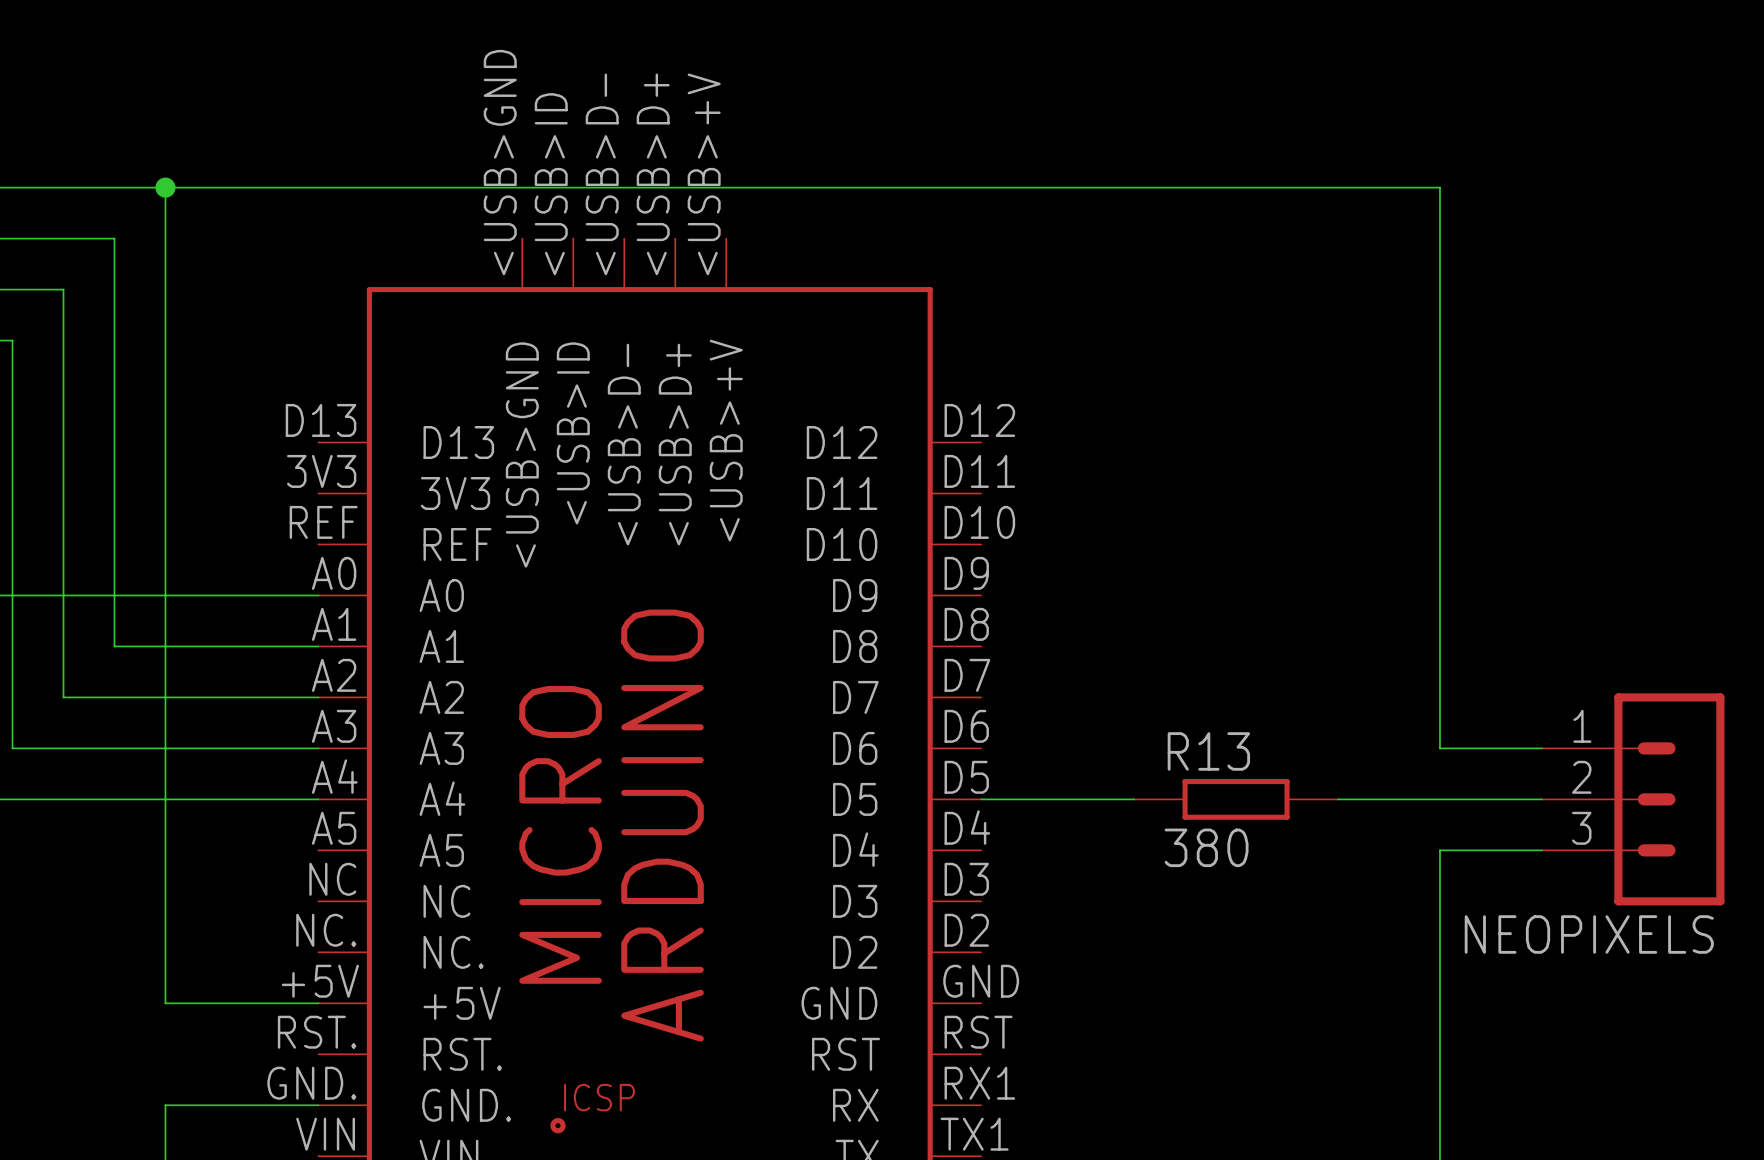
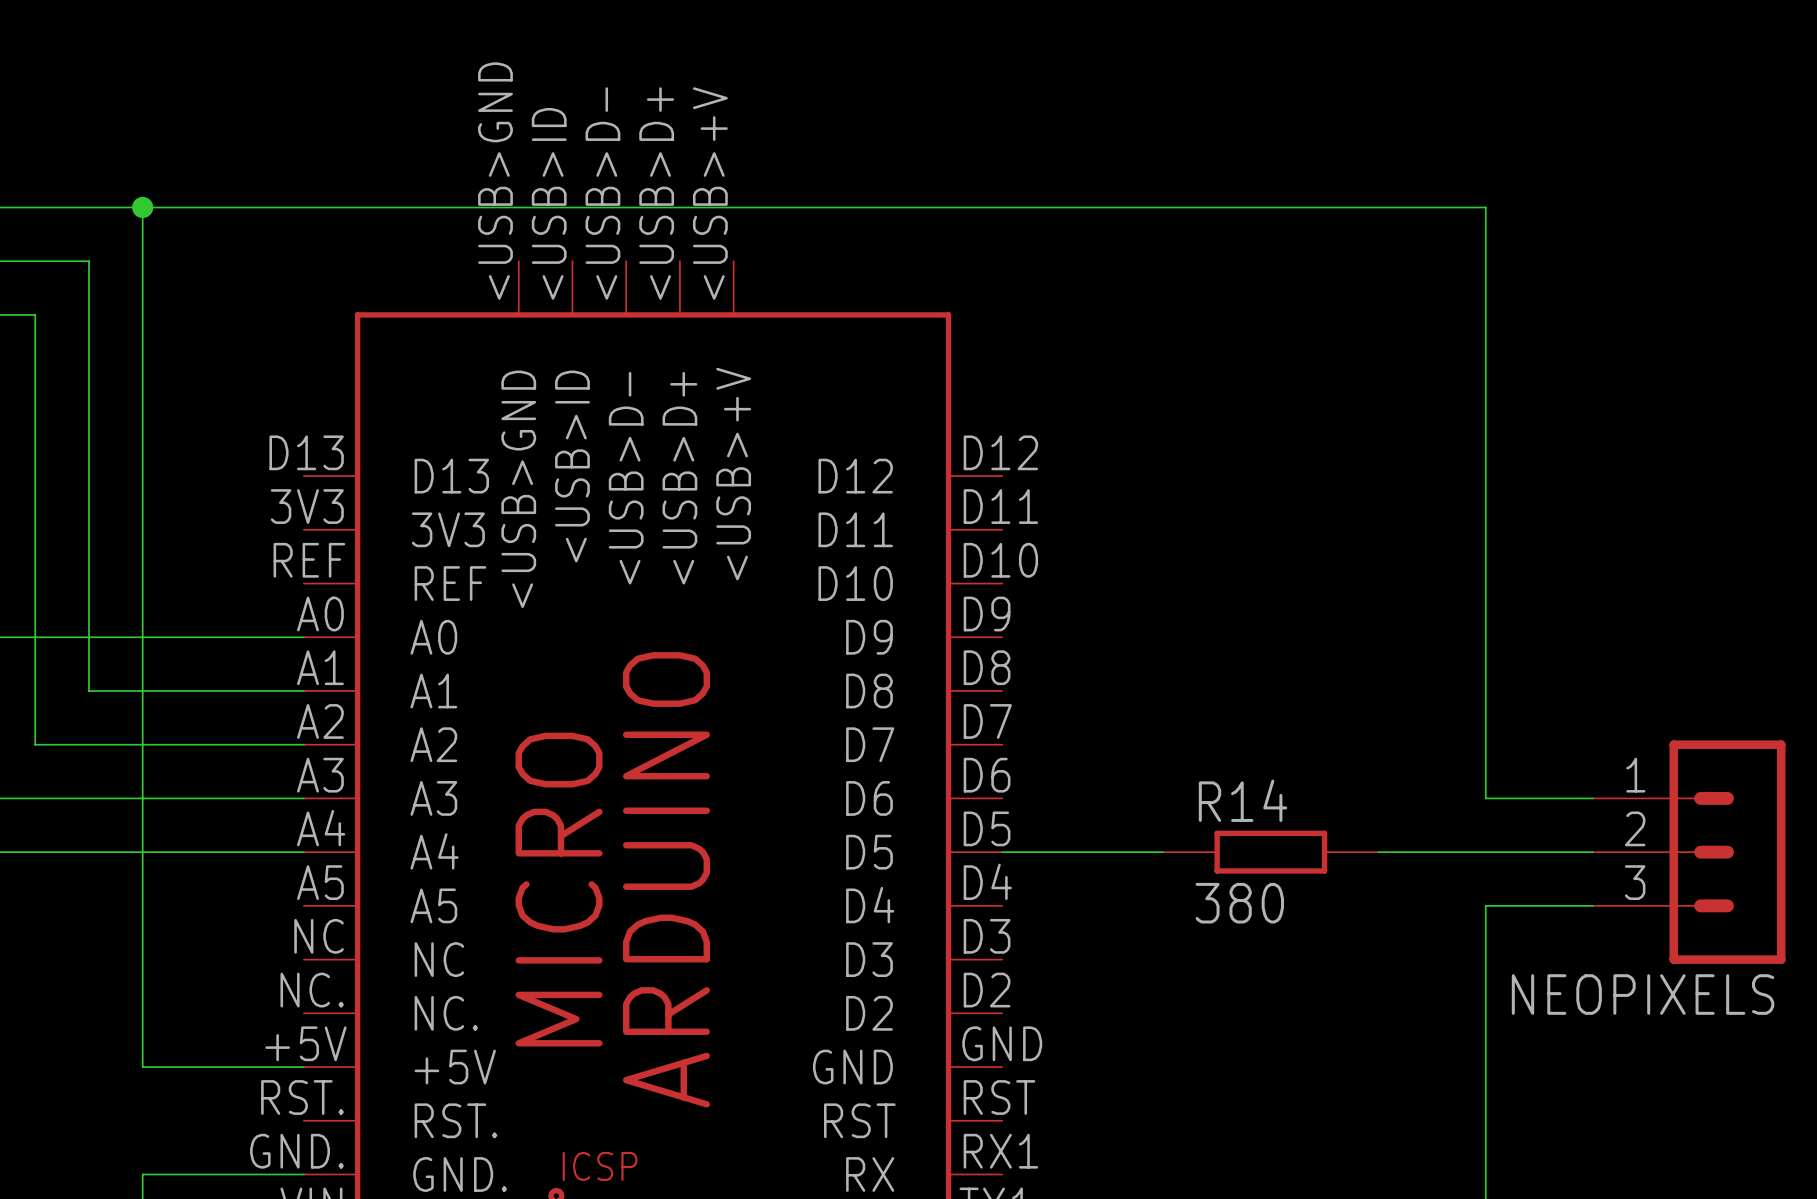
R13 name: R13 (1208, 751) -> R14 (1243, 800)

